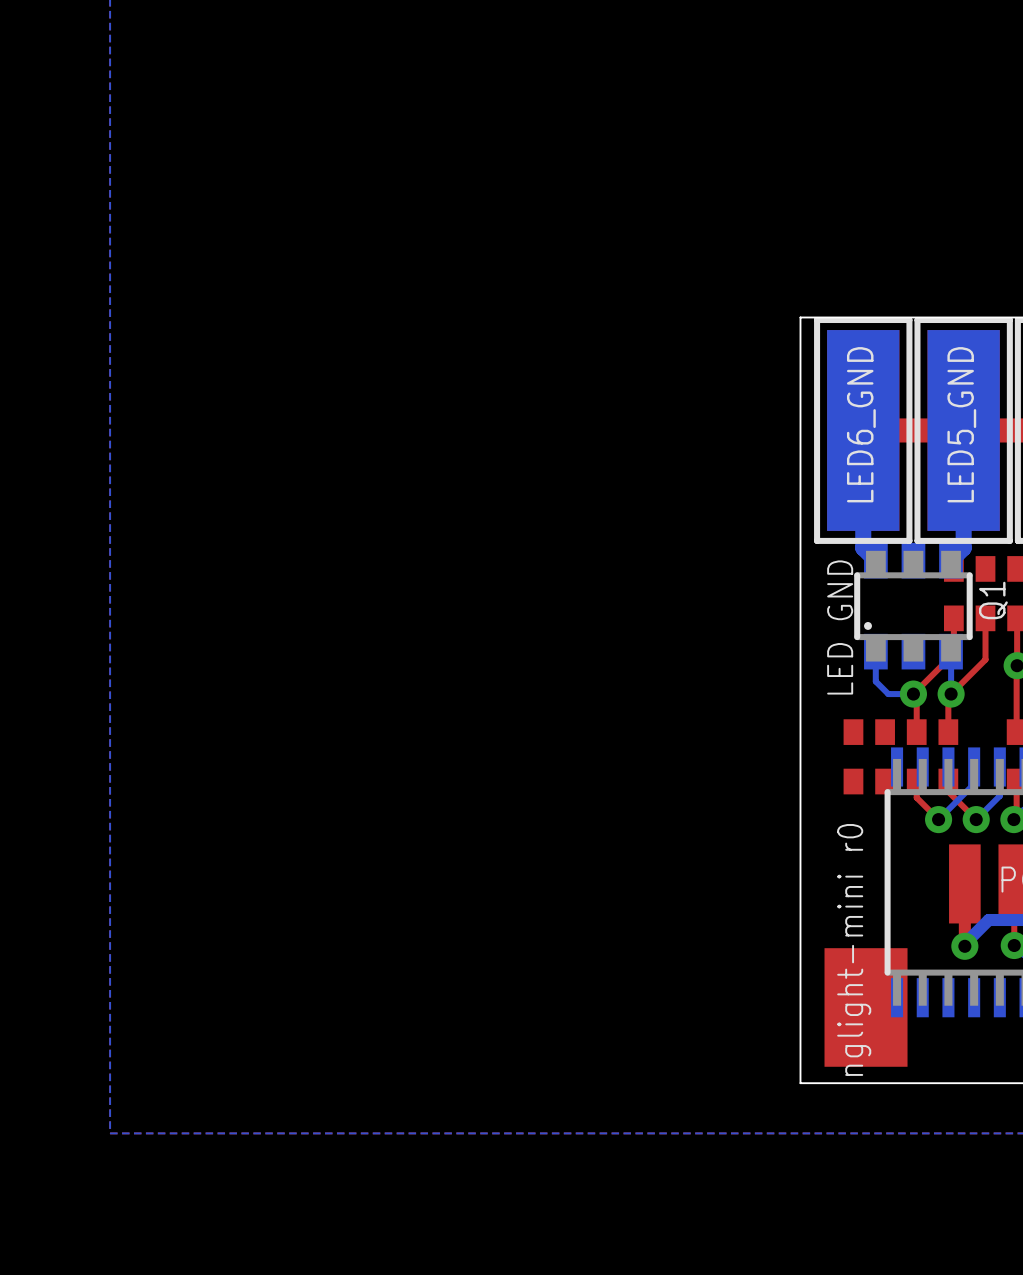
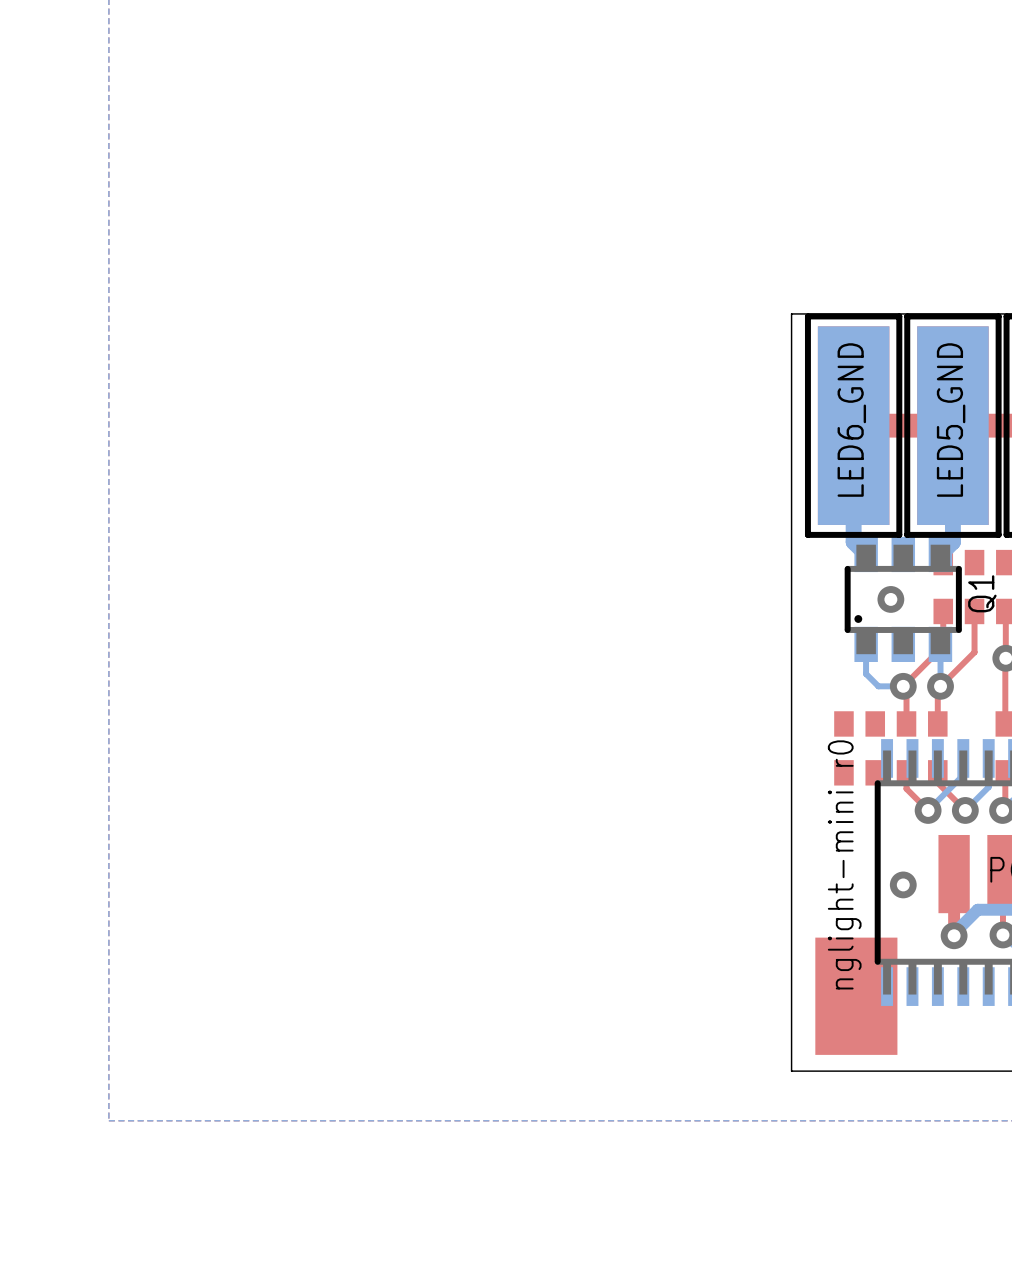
via: none -> (890, 599)
text: LED GND (840, 627) -> none
via: none -> (903, 884)
text position: nglight-mini r0 (854, 949) -> nglight-mini r0 (844, 864)

